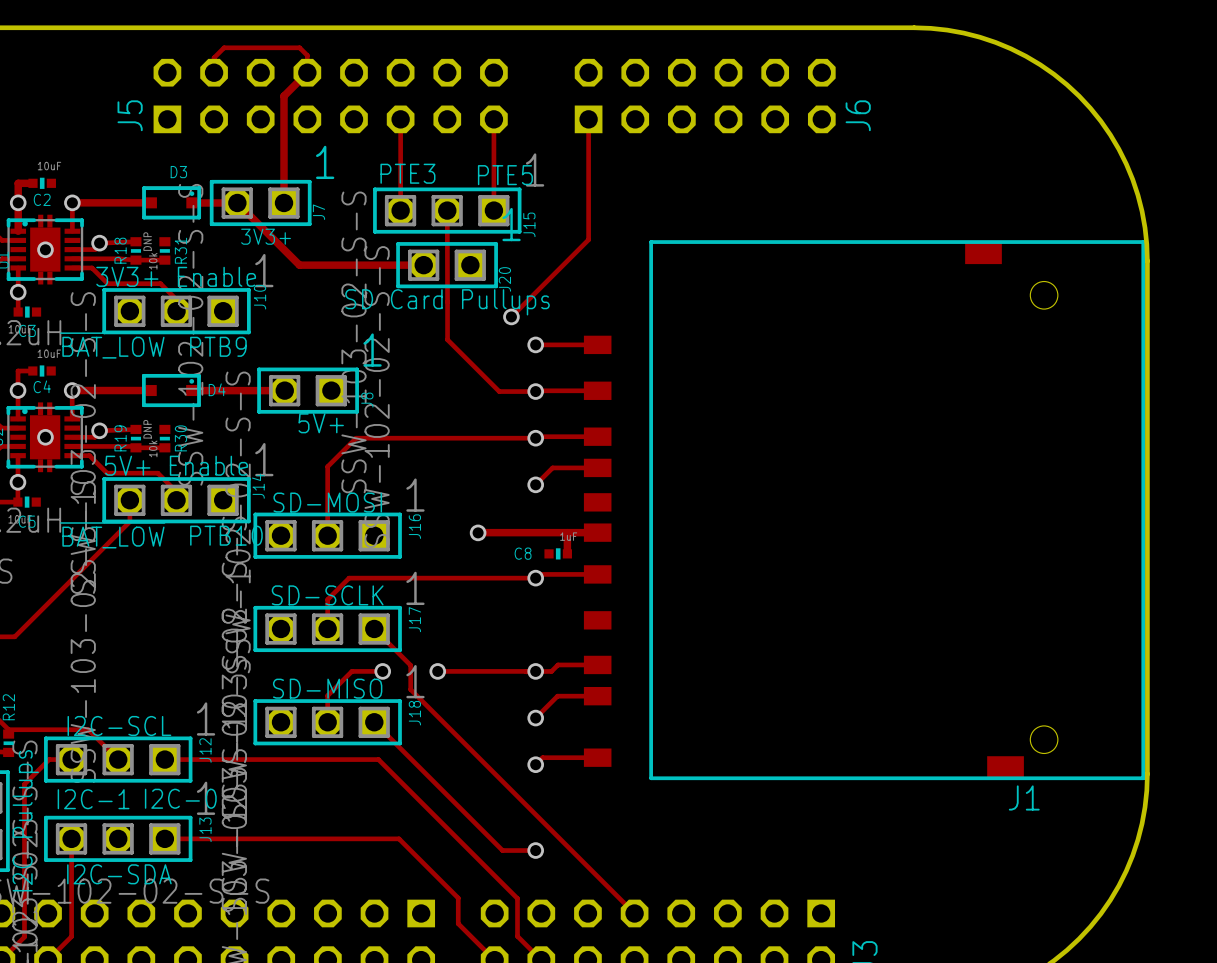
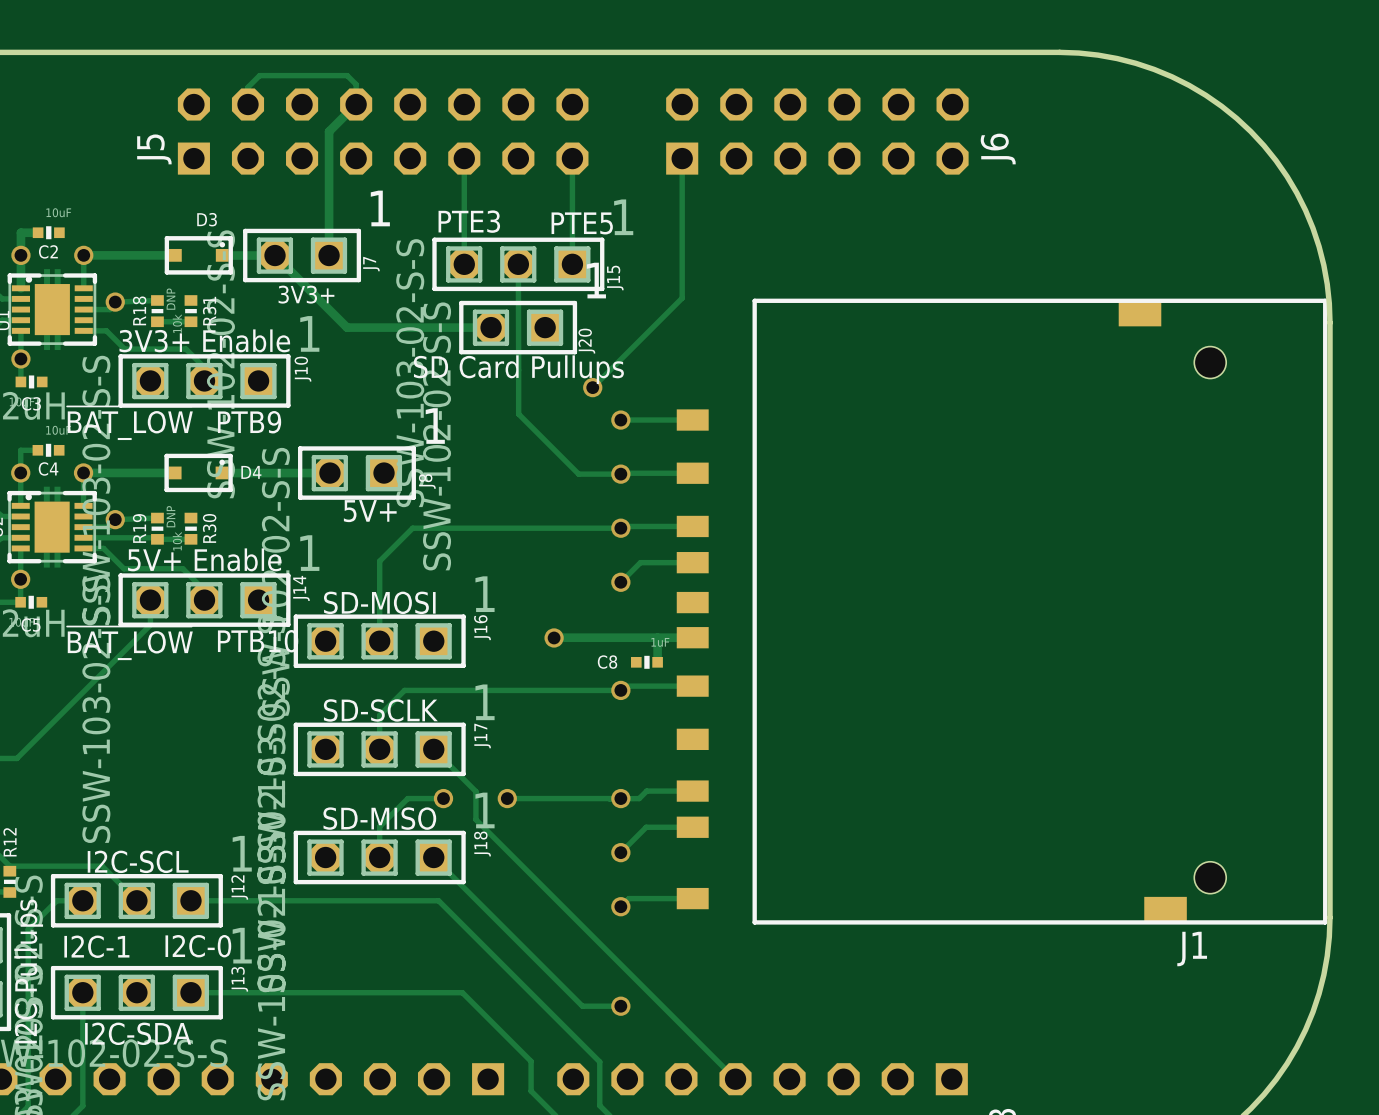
via: (45, 249) -> none
track: (72, 258) (135, 260) -> none
via: (45, 437) -> none

